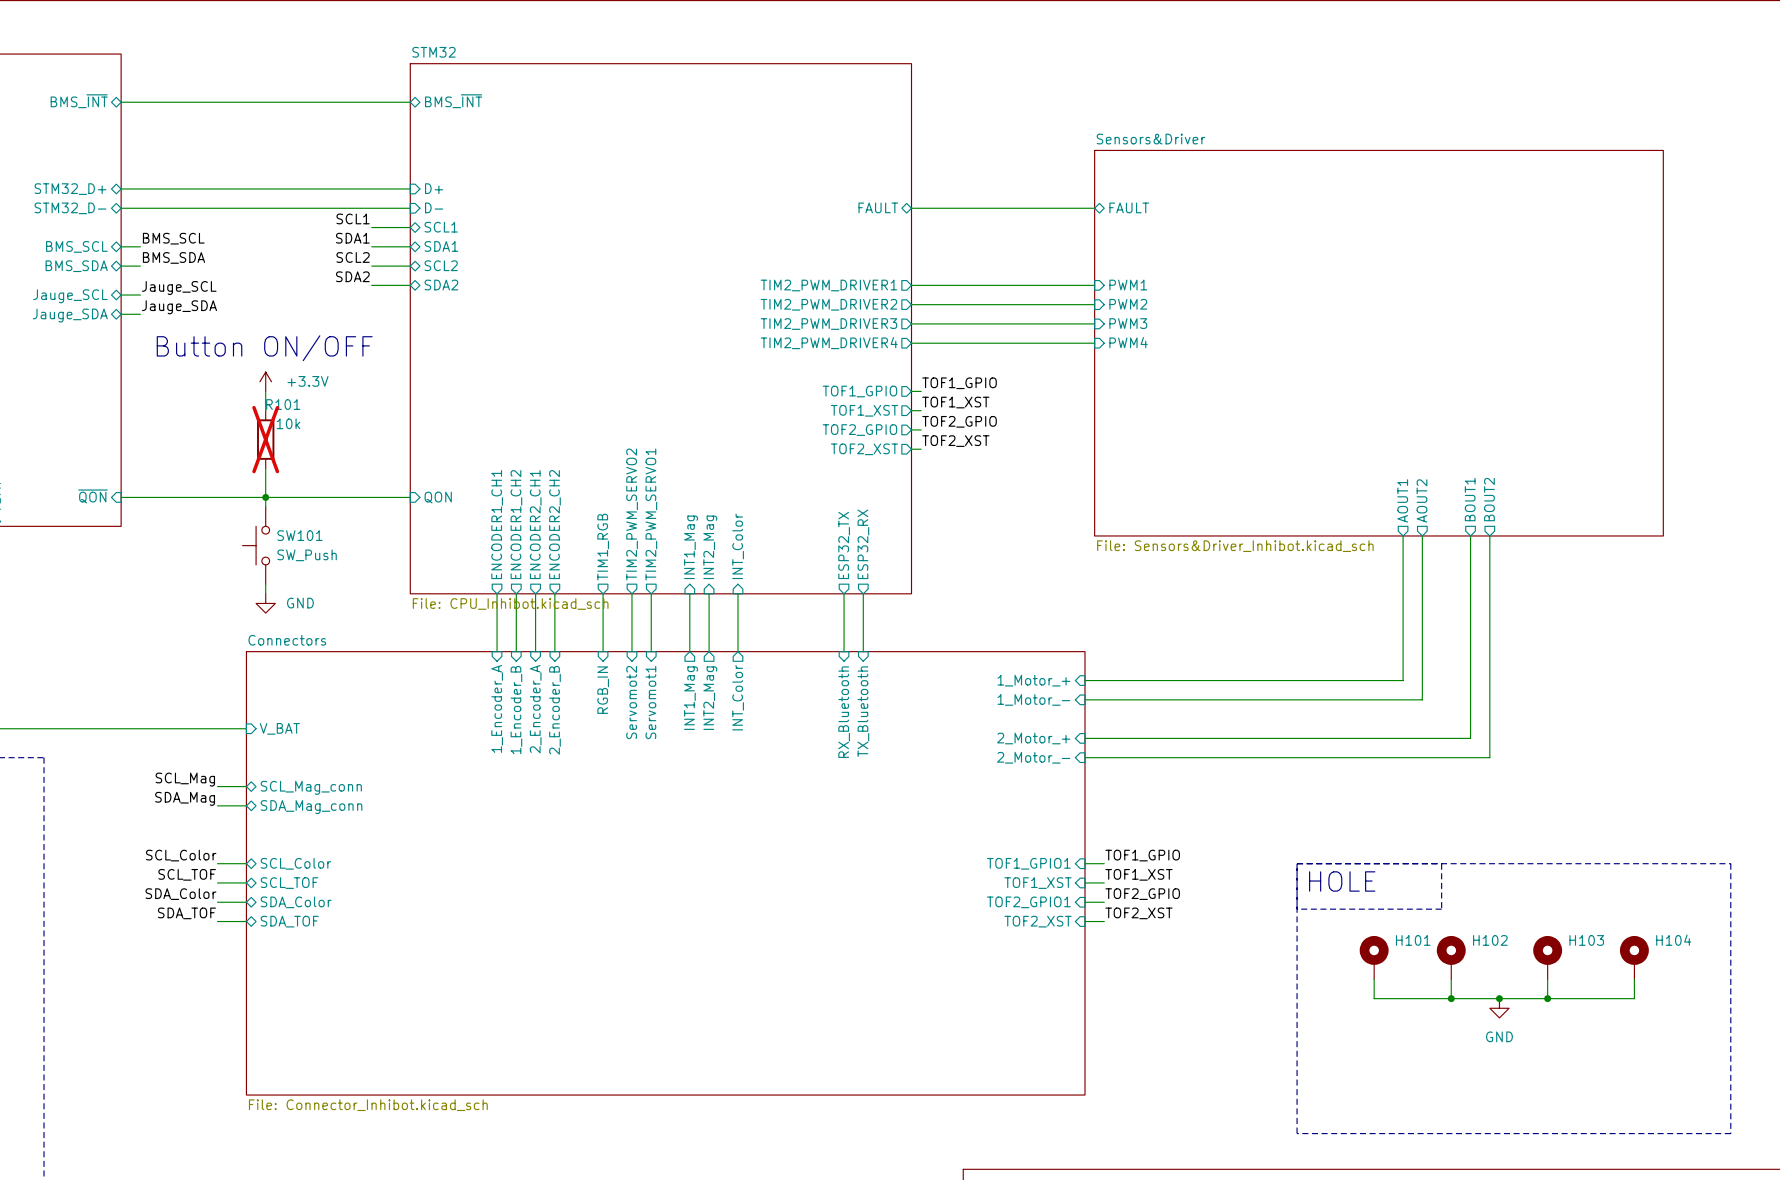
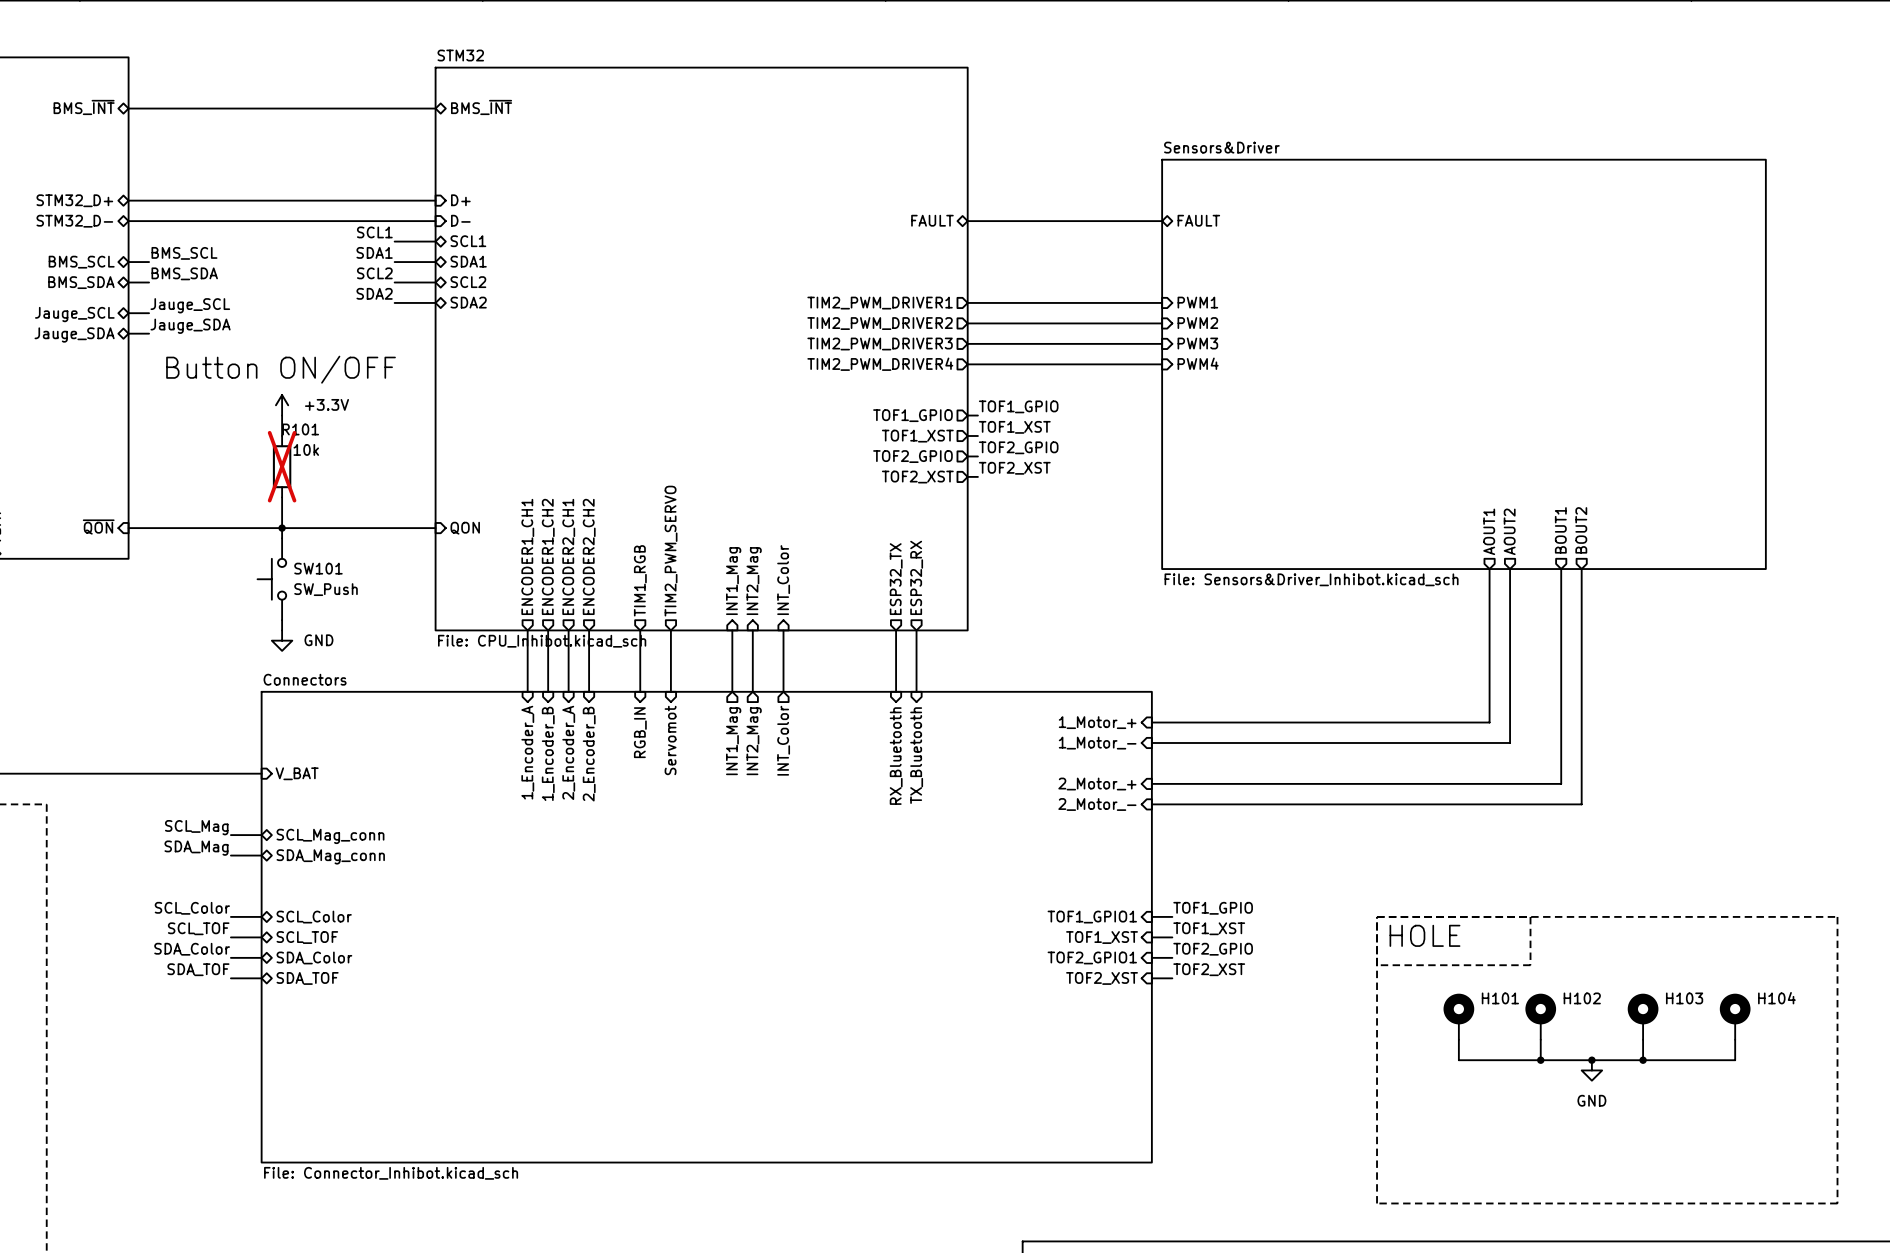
sheet pin: TIM2_PWM_SERVO2 (632, 514) -> TIM2_PWM_SERVO (671, 551)
sheet pin: TIM2_PWM_SERVO1 (651, 514) -> none
wire: (651, 593) (651, 651) -> none
sheet pin: Servomot2 (631, 702) -> Servomot (670, 740)
sheet pin: Servomot1 (650, 702) -> none

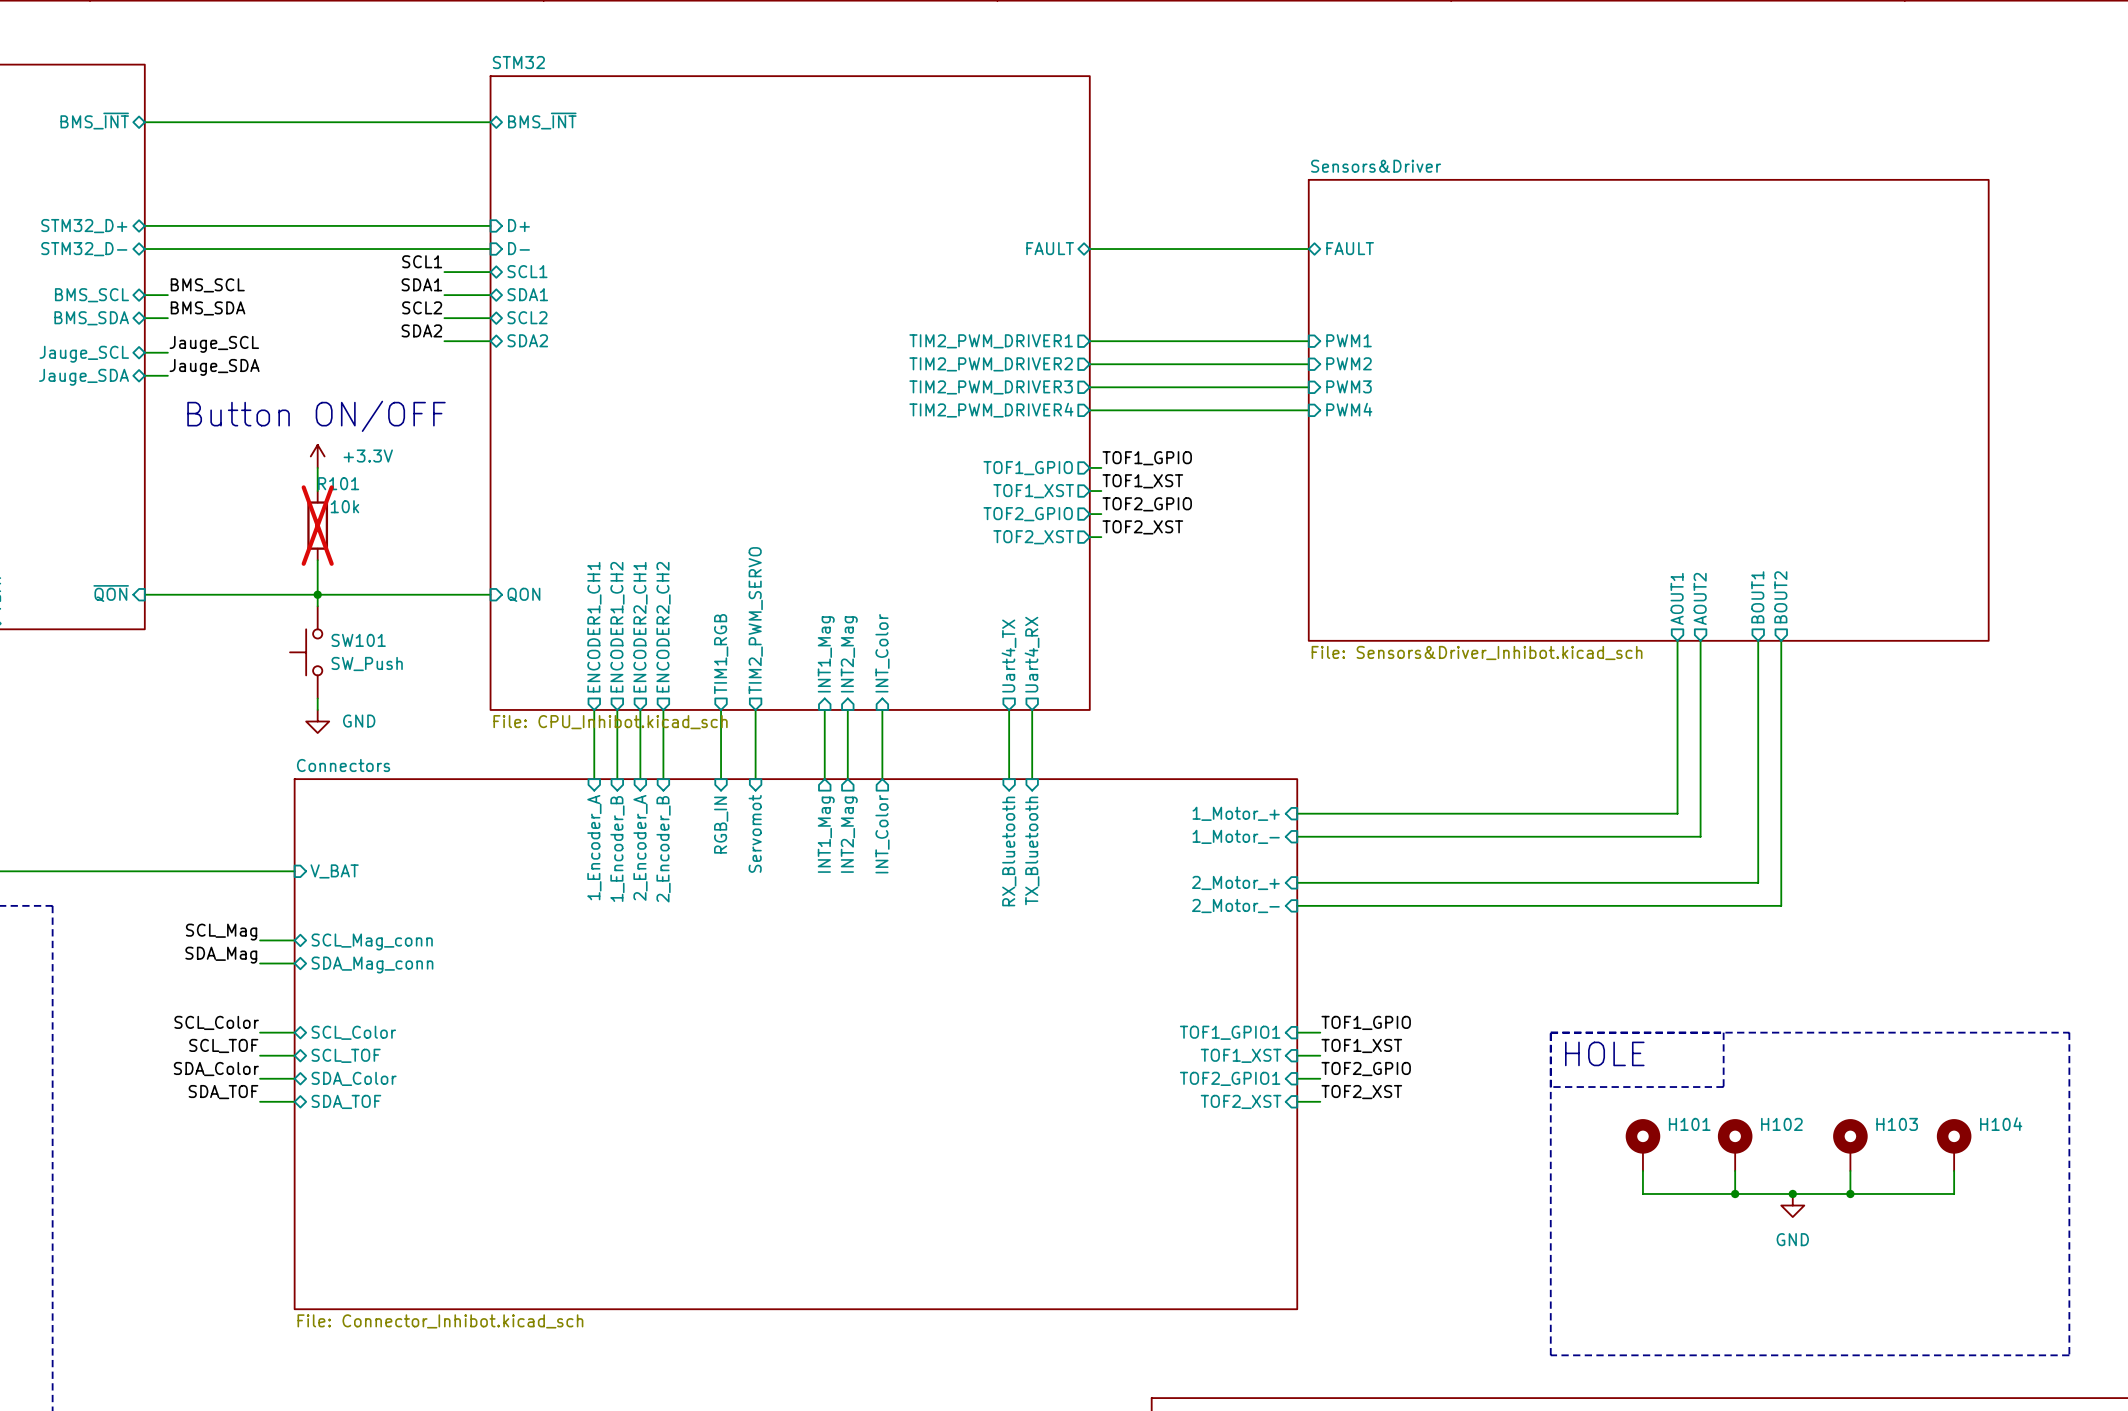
sheet pin: ESP32_RX (916, 577) -> Uart4_RX (1032, 654)
sheet pin: ESP32_TX (896, 579) -> Uart4_TX (1008, 656)

